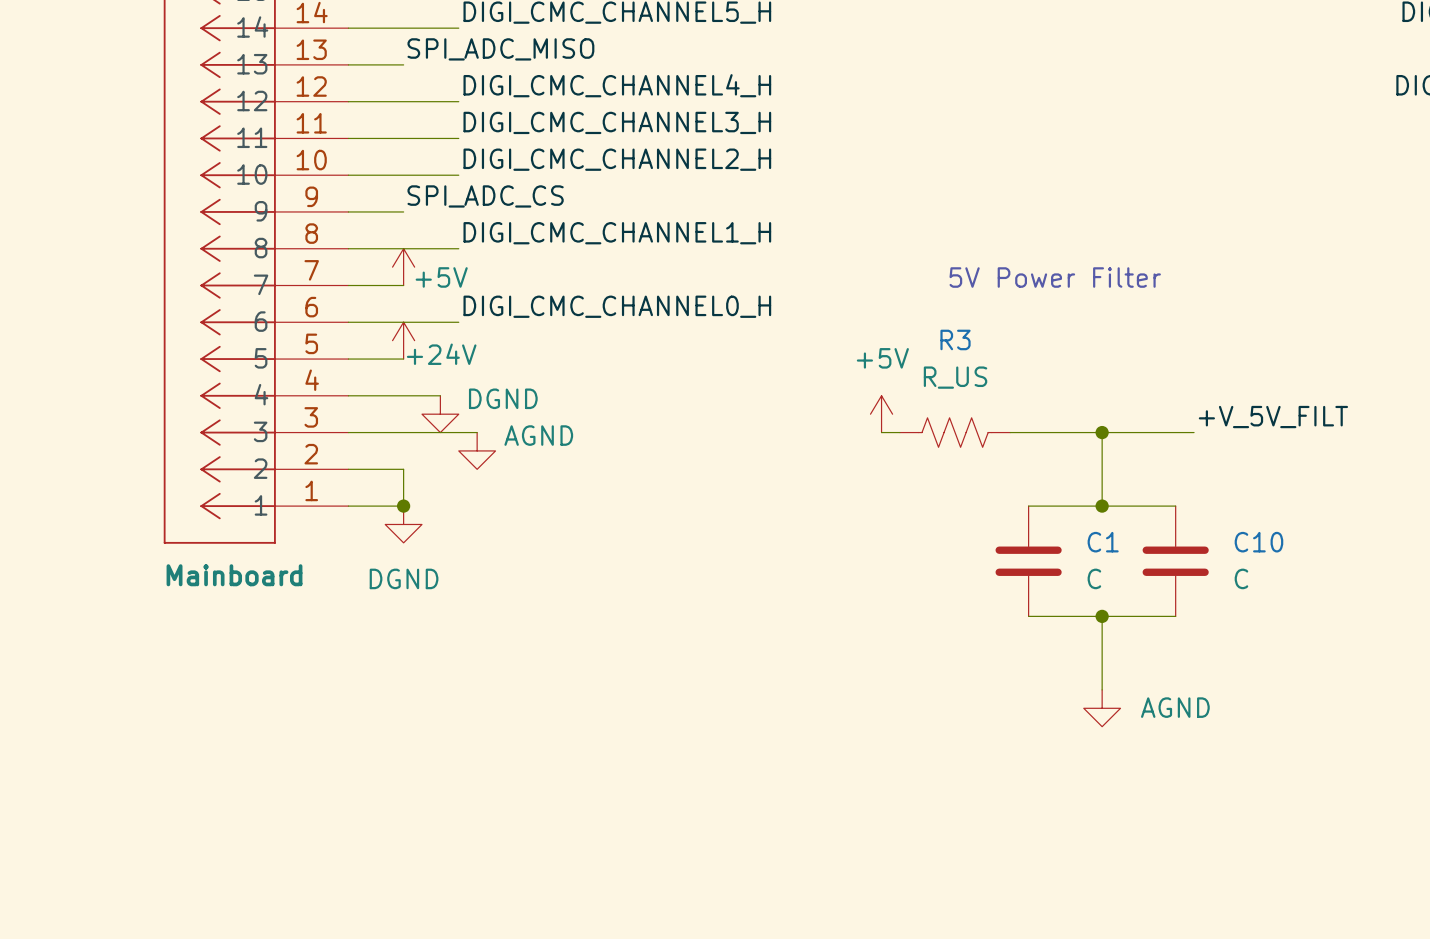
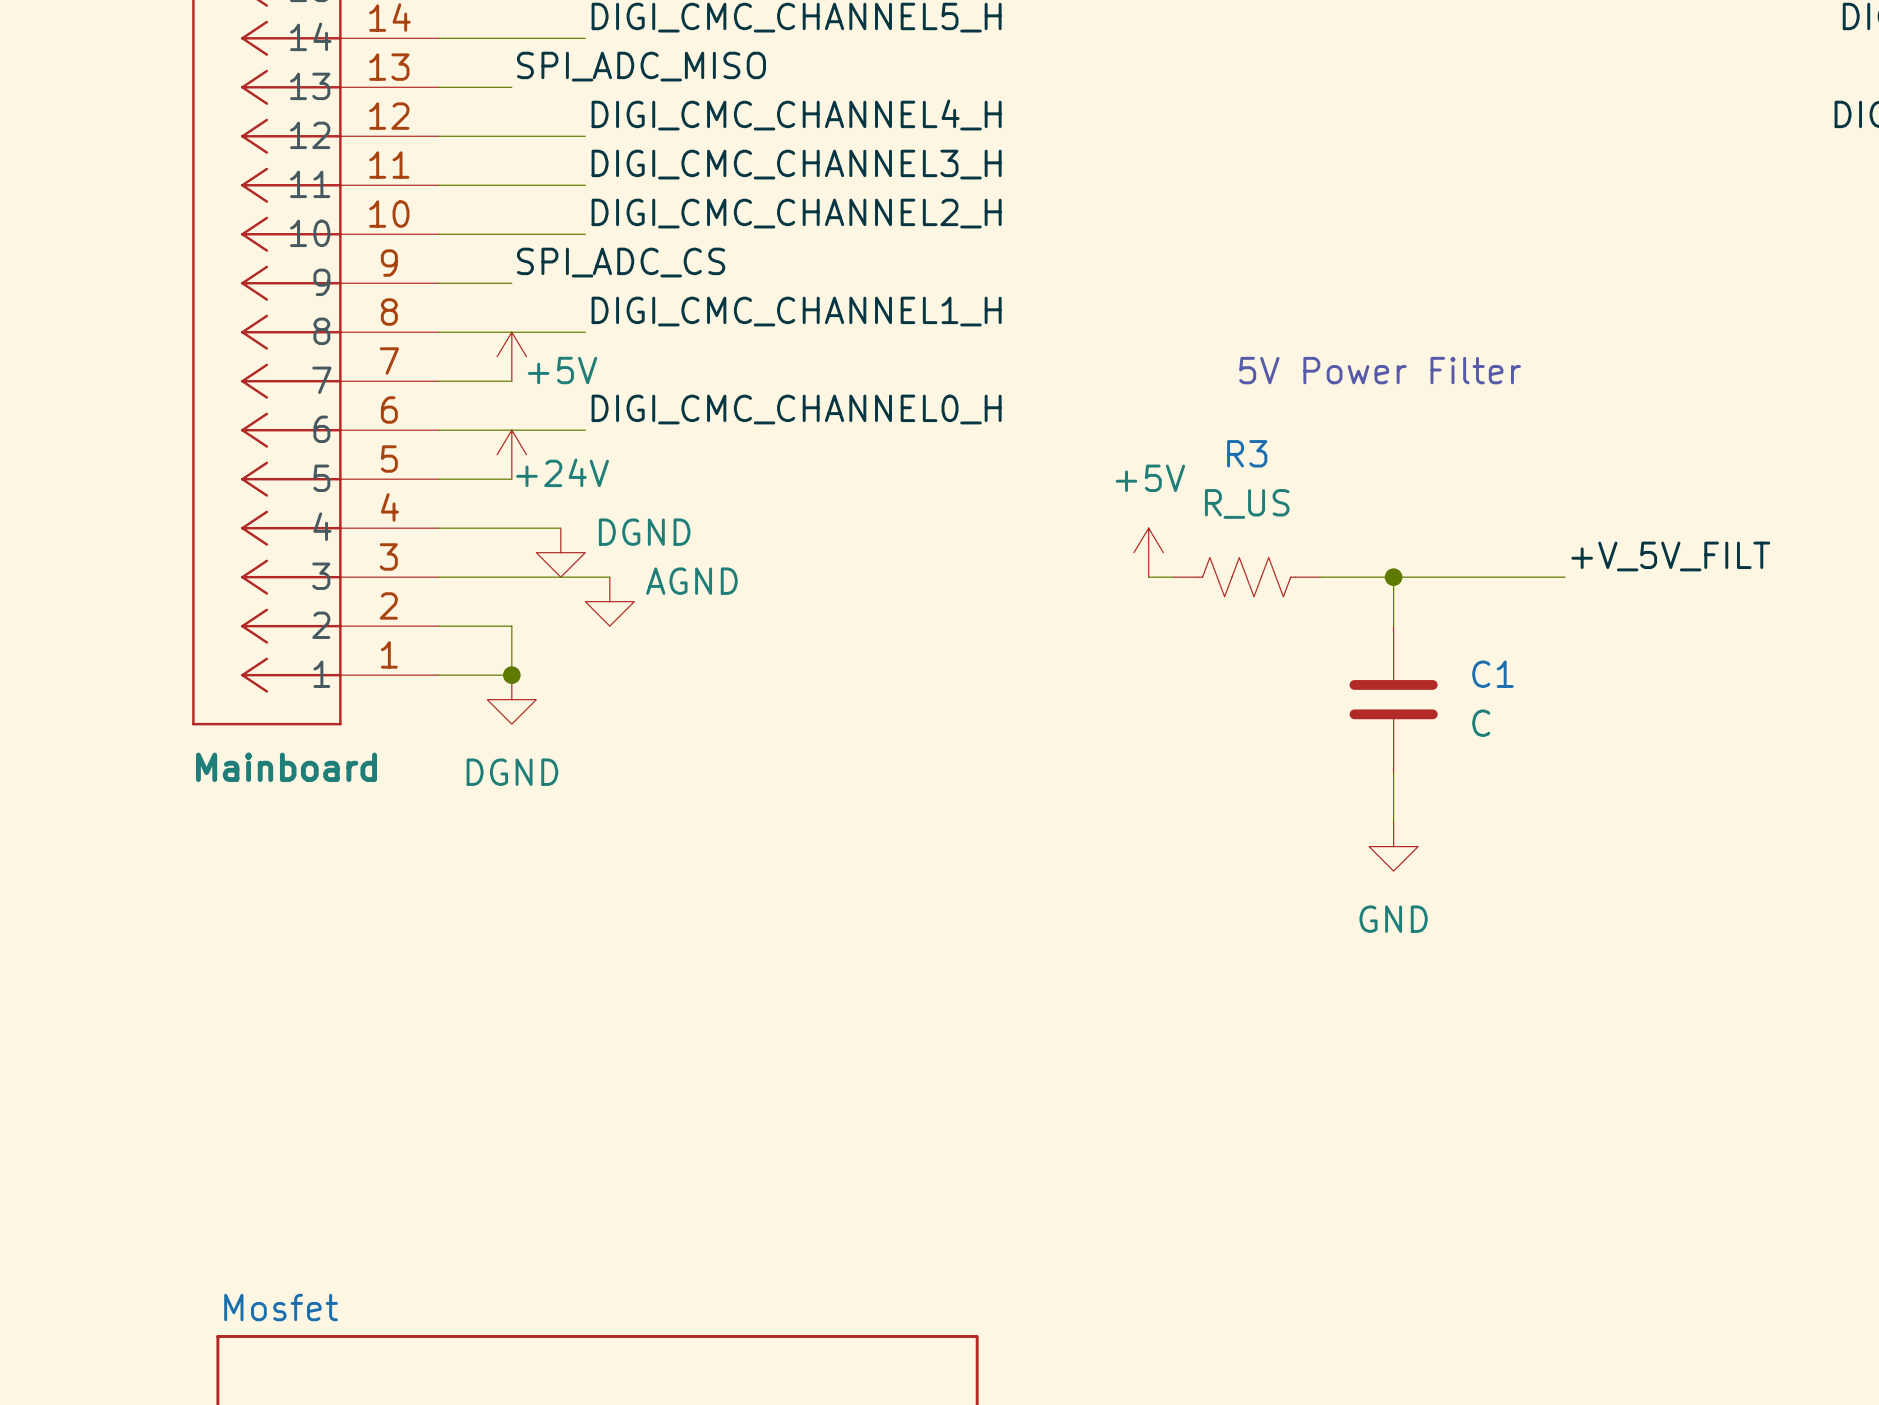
wire: none -> (1393, 577) (1393, 626)
wire: (1102, 432) (1102, 506) -> none
junction position: (1102, 432) -> (1393, 577)
wire: (1028, 506) (1175, 506) -> none
junction: (1102, 506) -> none
C1 position: (1028, 561) -> (1393, 699)
C10: C (1175, 561) -> none
wire: none -> (1393, 773) (1393, 822)
wire: (1028, 616) (1175, 616) -> none
wire: (1102, 616) (1102, 689) -> none
junction: (1102, 616) -> none
power symbol: none -> GND (1393, 846)
power symbol: AGND (1102, 708) -> none

